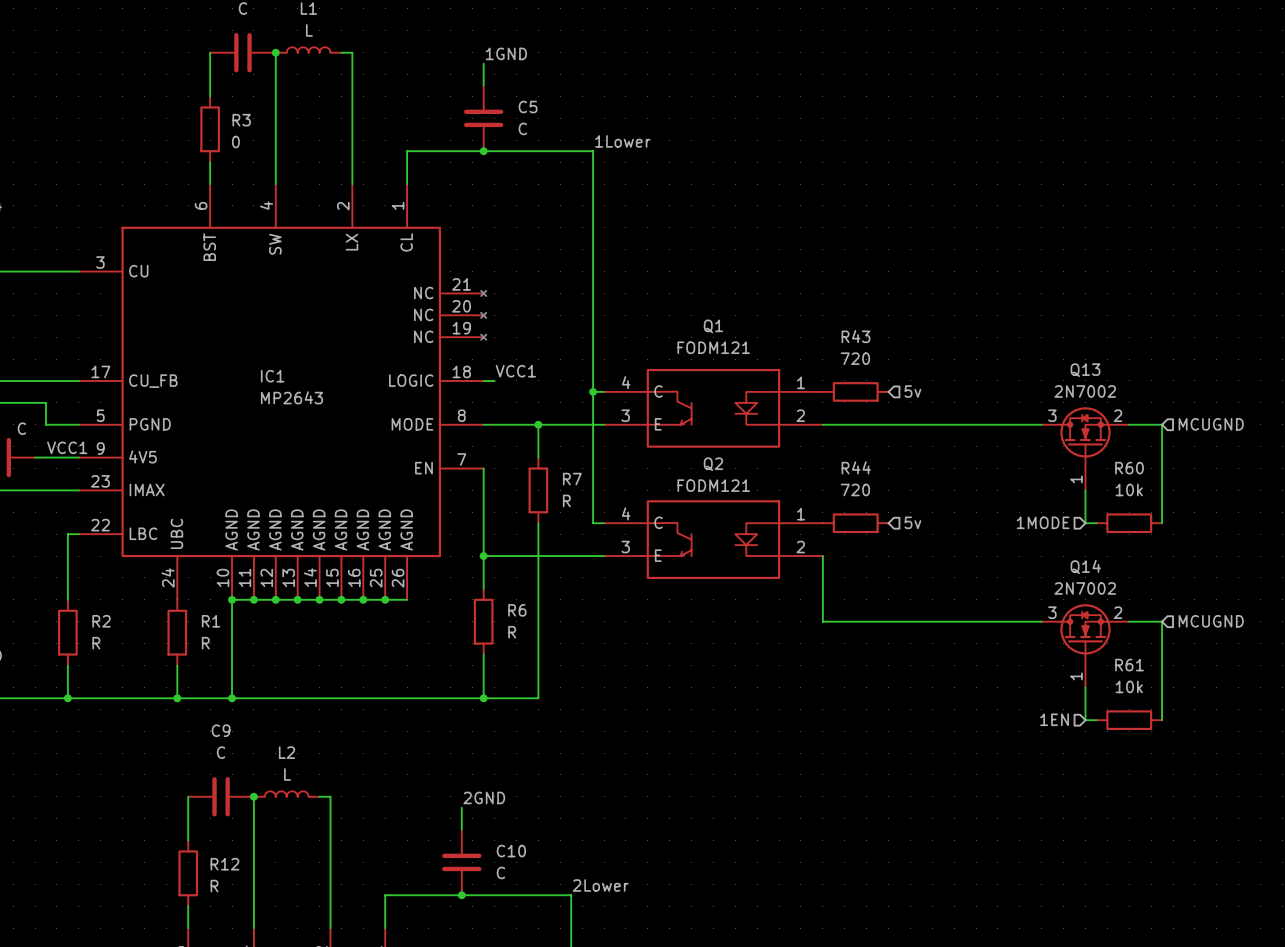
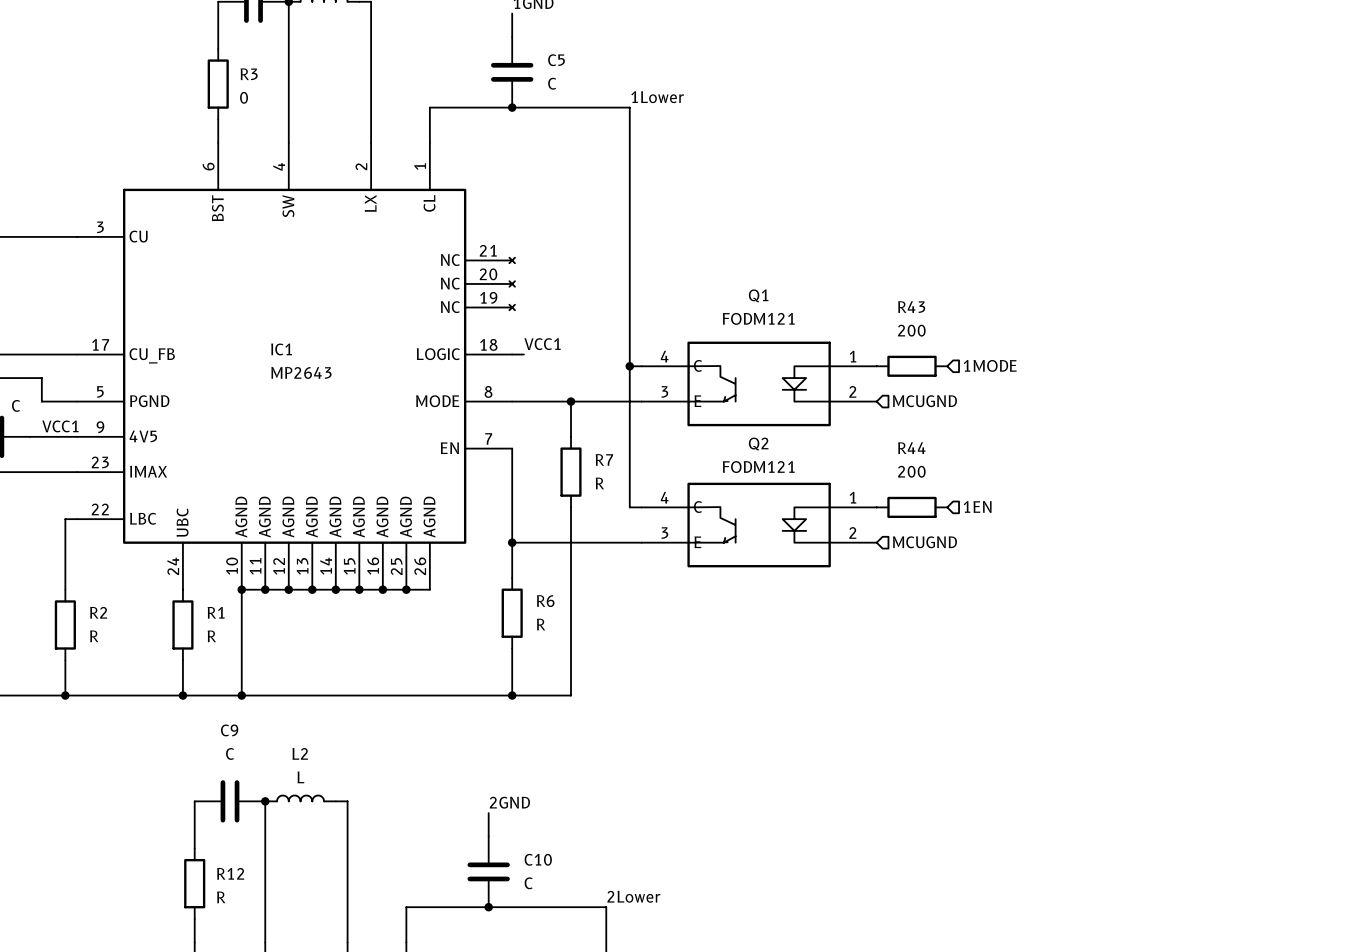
R43 value: 720 (855, 358) -> 200 (911, 330)
hierarchical label: 5v (912, 391) -> 1MODE (990, 365)
wire: (822, 424) (1041, 424) -> none
hierarchical label: none -> MCUGND (924, 401)
wire: (1129, 424) (1162, 424) (1162, 523) -> none
hierarchical label: MCUGND (1211, 424) -> none
Q13: 2N7002 (1085, 448) -> none
R44 value: 720 (855, 489) -> 200 (911, 471)
wire: (1085, 490) (1085, 523) (1096, 523) -> none
hierarchical label: 5v (912, 522) -> 1EN (977, 506)
hierarchical label: 1MODE (1043, 522) -> none
R60: 10k (1129, 523) -> none
hierarchical label: none -> MCUGND (924, 542)
wire: (822, 556) (822, 621) (1041, 621) -> none
wire: (1129, 621) (1162, 621) (1162, 720) -> none
hierarchical label: MCUGND (1211, 621) -> none
Q14: 2N7002 (1085, 645) -> none
wire: (1085, 687) (1085, 720) (1096, 720) -> none
hierarchical label: 1EN (1054, 719) -> none
R61: 10k (1129, 720) -> none

